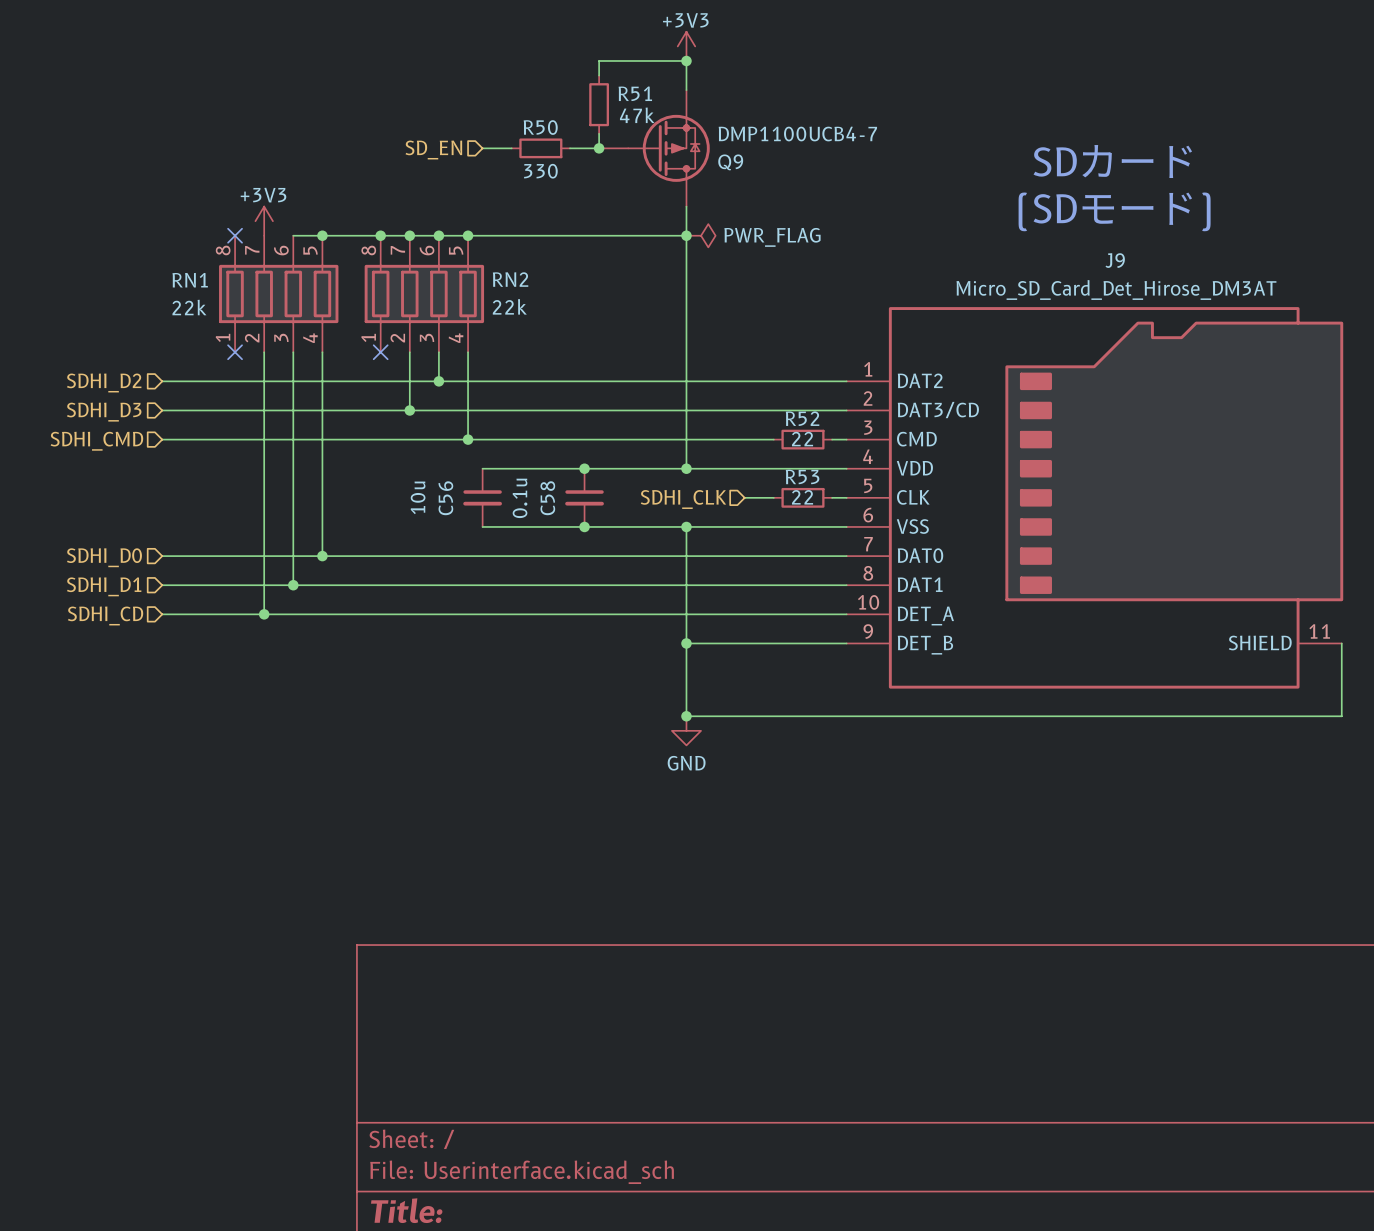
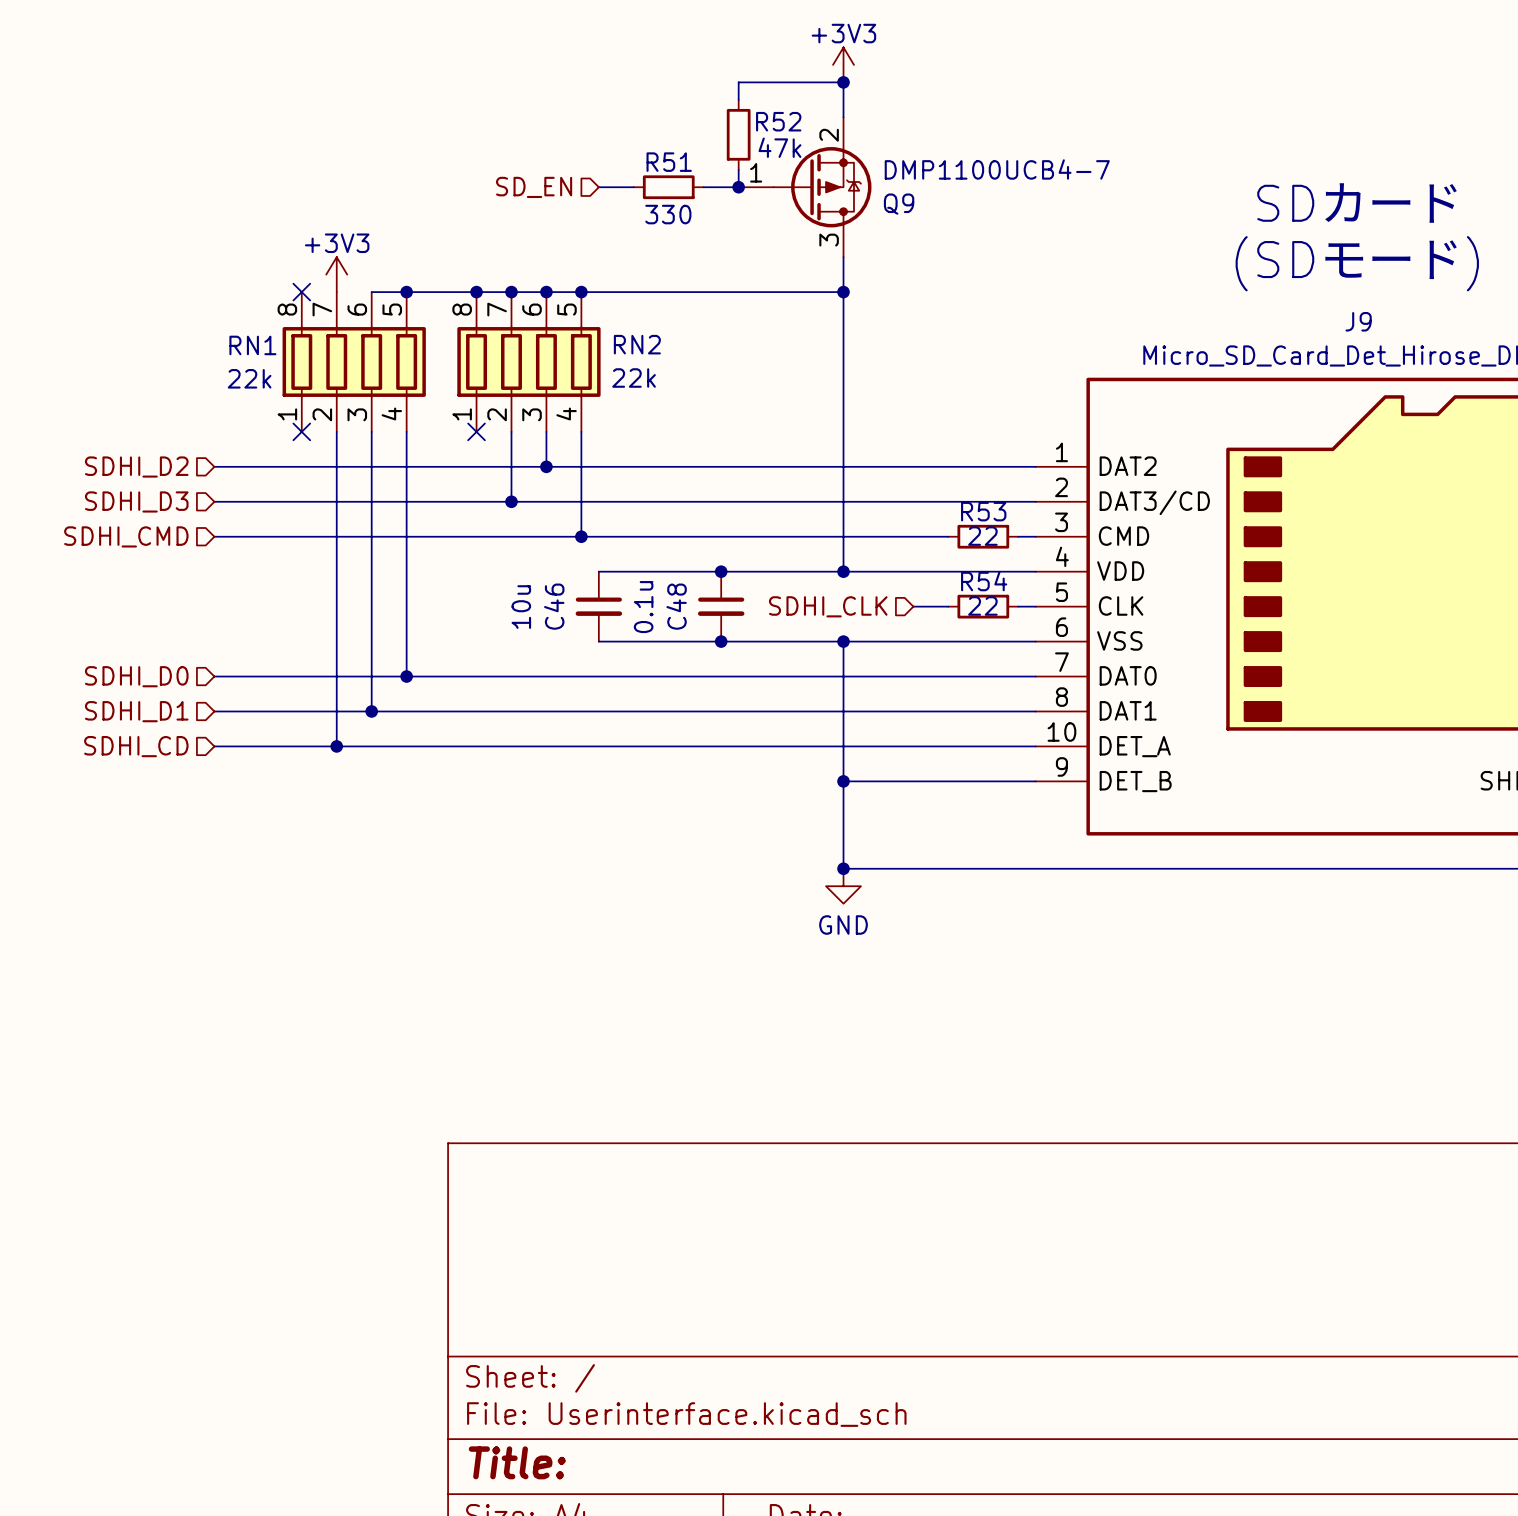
Q9 symbol: [599, 90, 710, 207] -> [738, 117, 872, 258]
R51 name: R51 (635, 93) -> R52 (778, 121)
R50 name: R50 (540, 127) -> R51 (669, 162)
power symbol: PWR_FLAG (701, 235) -> none
R52 name: R52 (802, 418) -> R53 (983, 511)
R53 name: R53 (802, 476) -> R54 (984, 581)
C56 name: C56 (445, 498) -> C46 (554, 606)
C58 name: C58 (547, 498) -> C48 (676, 606)

